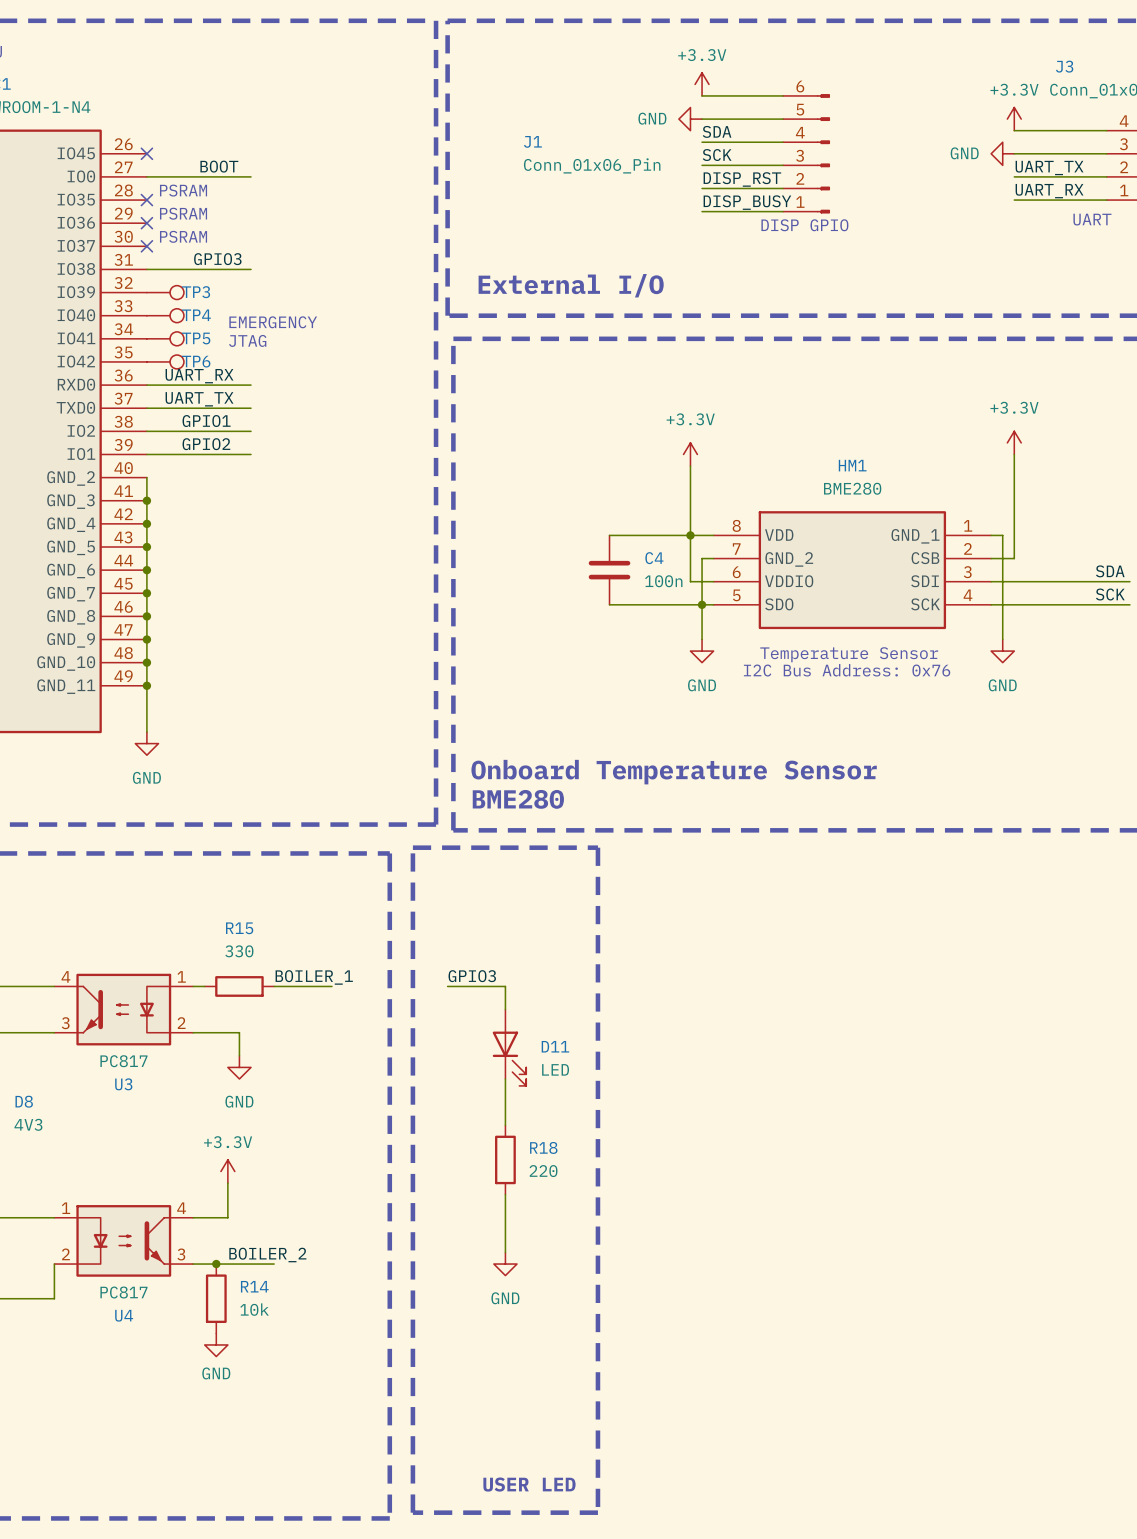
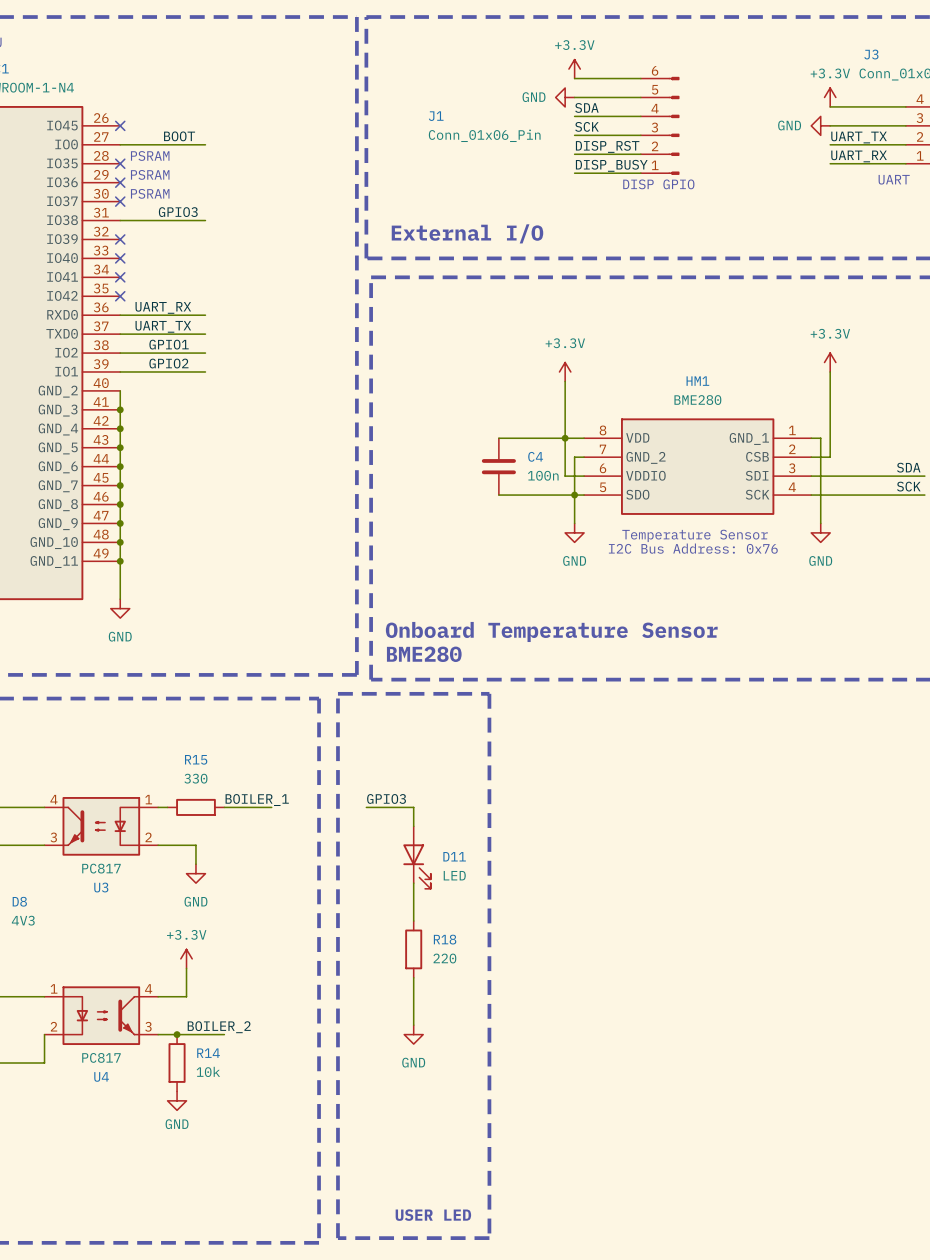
no-connect mark: none -> (120, 239)
TP3: (165, 292) -> none
no-connect mark: none -> (120, 258)
TP4: (165, 315) -> none
text: EMERGENCY (273, 322) -> none
no-connect mark: none -> (120, 277)
TP5: (165, 338) -> none
text: JTAG (247, 340) -> none
no-connect mark: none -> (120, 296)
TP6: (165, 361) -> none

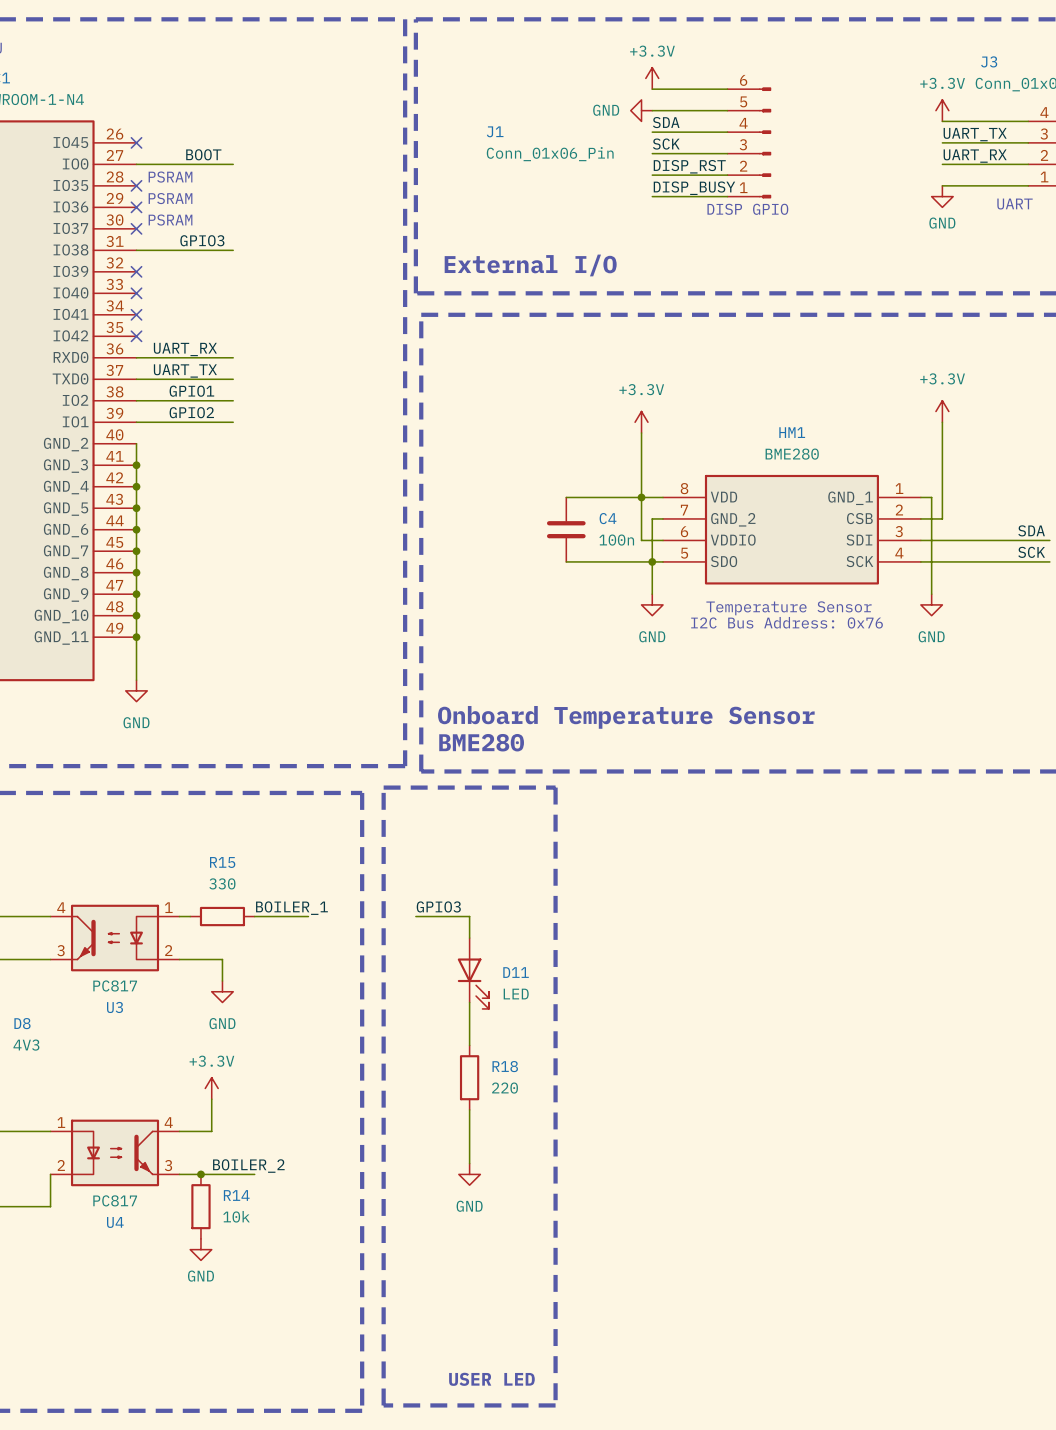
label: none -> UART_TX (975, 134)
power symbol rotation: 0° (820, 125) -> 90° counterclockwise (942, 196)
power symbol position: GND (820, 125) -> GND (942, 196)
label: UART_TX (859, 137) -> UART_RX (975, 156)
label: UART_RX (859, 156) -> none

